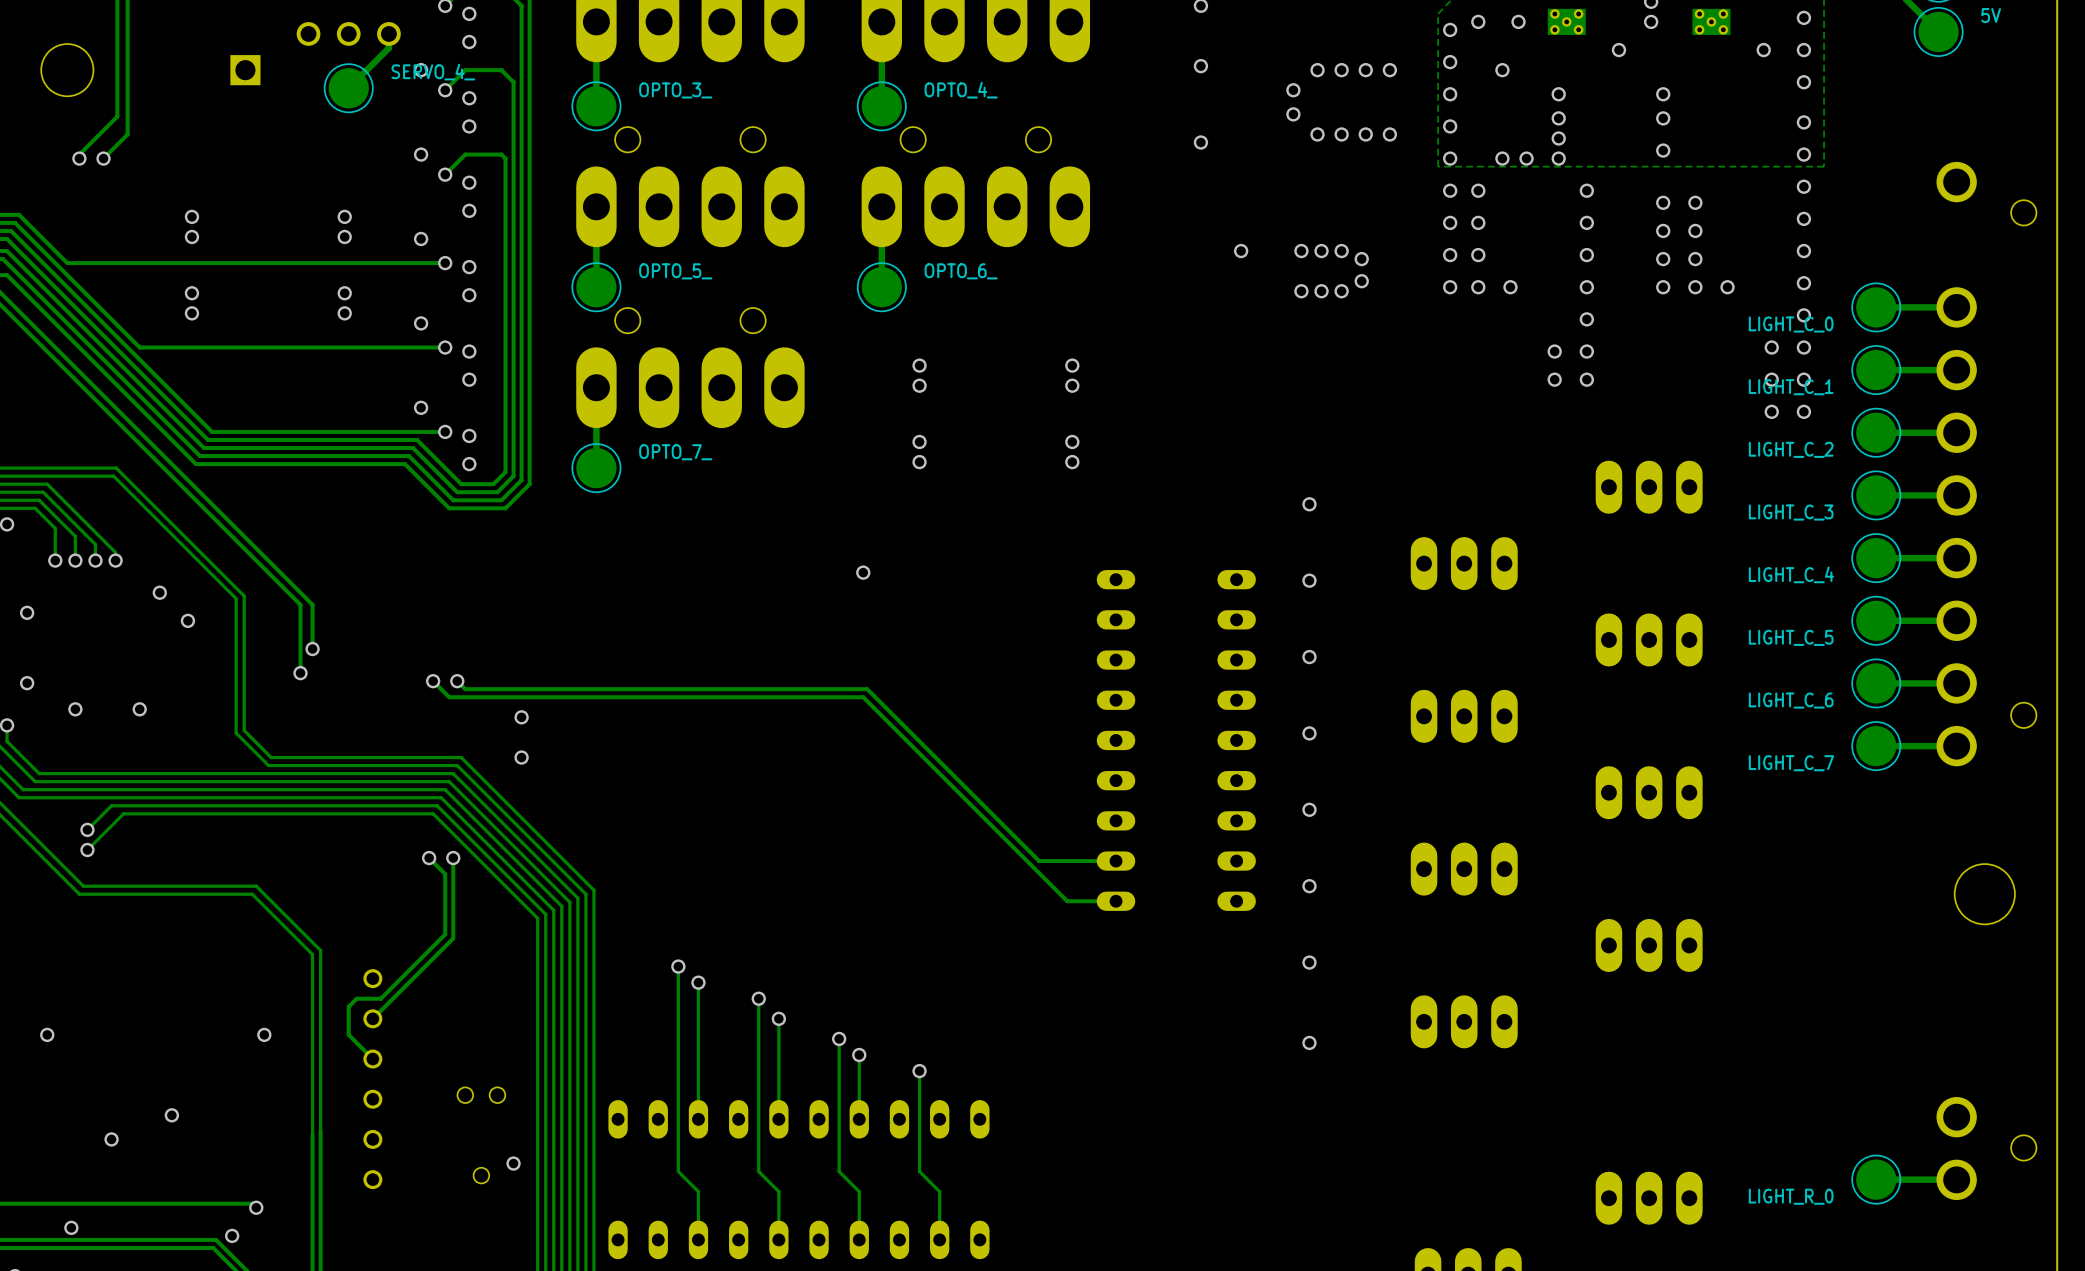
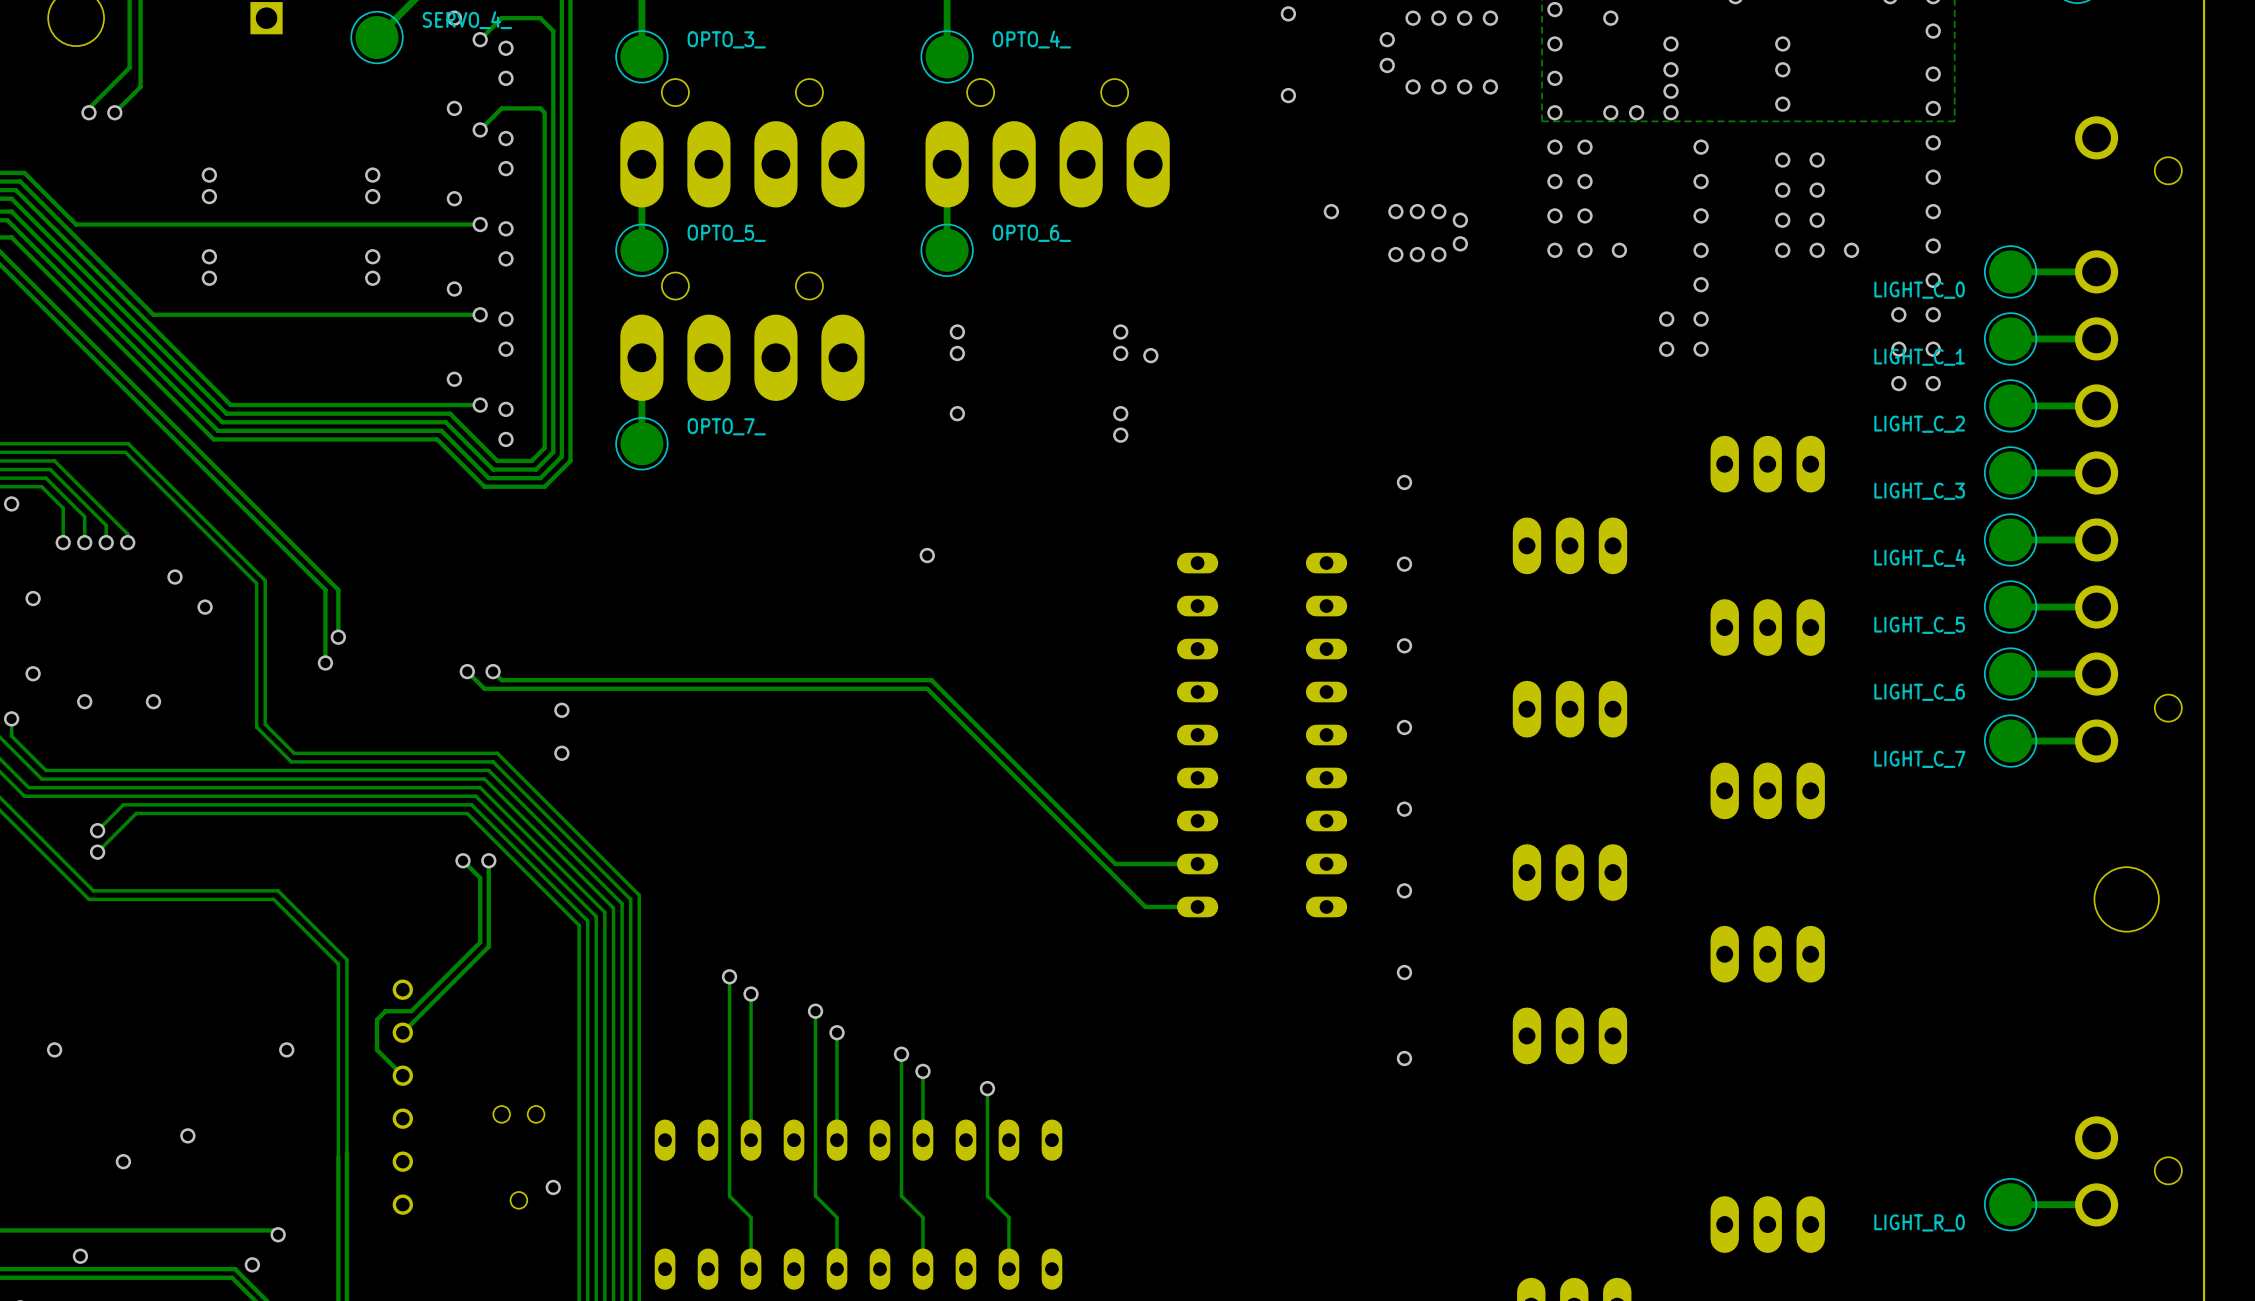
via: none -> (957, 331)
via: none -> (1120, 331)
via: (919, 365) -> none
via: (1072, 365) -> none
via: none -> (957, 353)
via: none -> (1120, 353)
via: (919, 385) -> none
via: none -> (957, 413)
via: none -> (1120, 413)
via: (919, 441) -> none
via: (1072, 441) -> none
via: none -> (1120, 435)
via: (919, 462) -> none
via: (1072, 462) -> none

